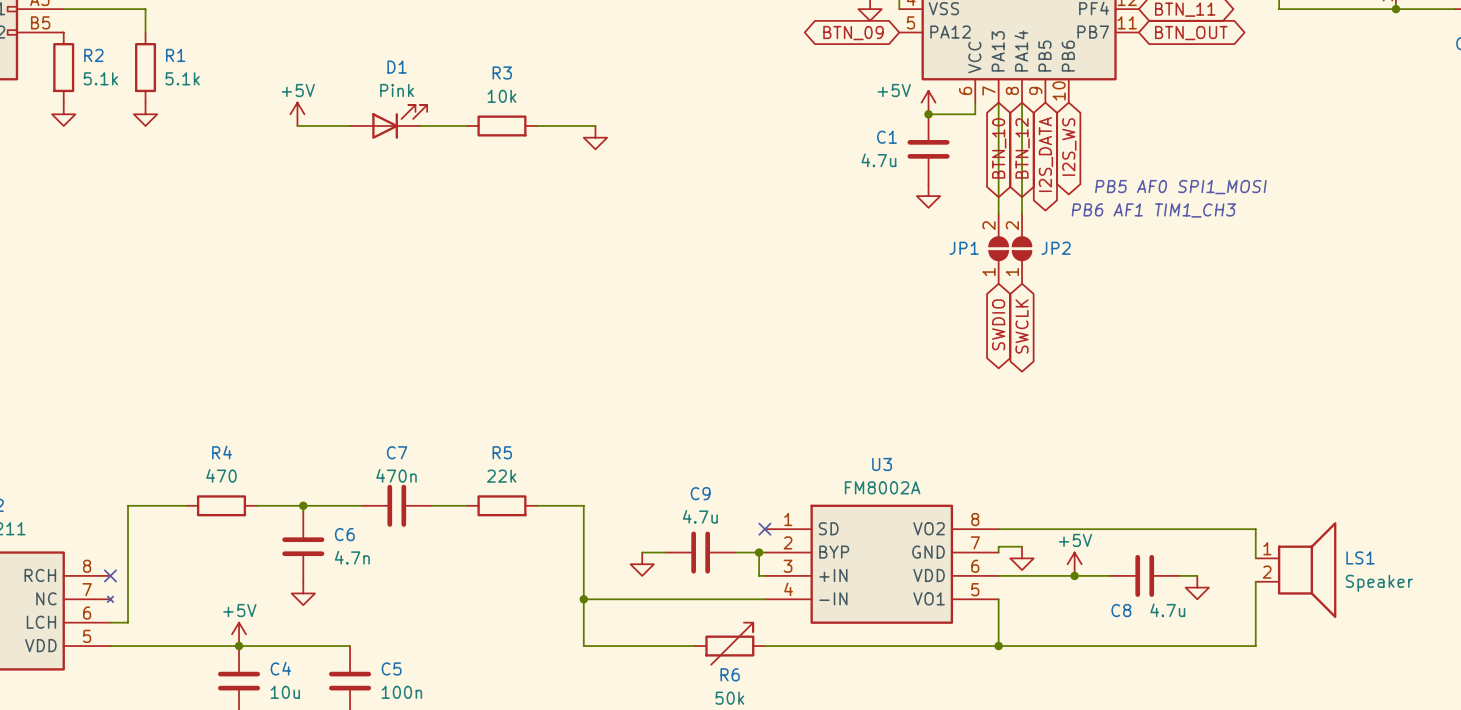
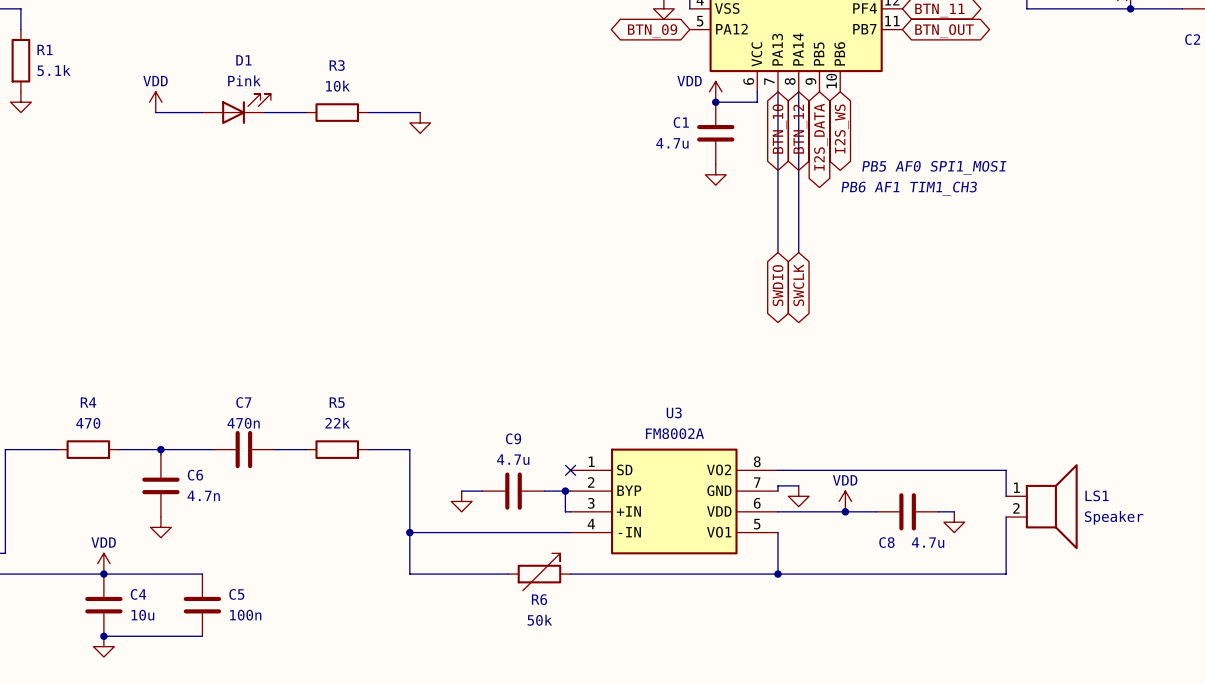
power symbol: +5V (928, 102) -> VDD (715, 91)
power symbol: +5V (297, 114) -> VDD (155, 102)
JP1: (998, 248) -> none
JP2: (1022, 248) -> none
power symbol: +5V (1074, 564) -> VDD (845, 501)
power symbol: +5V (239, 634) -> VDD (103, 563)

